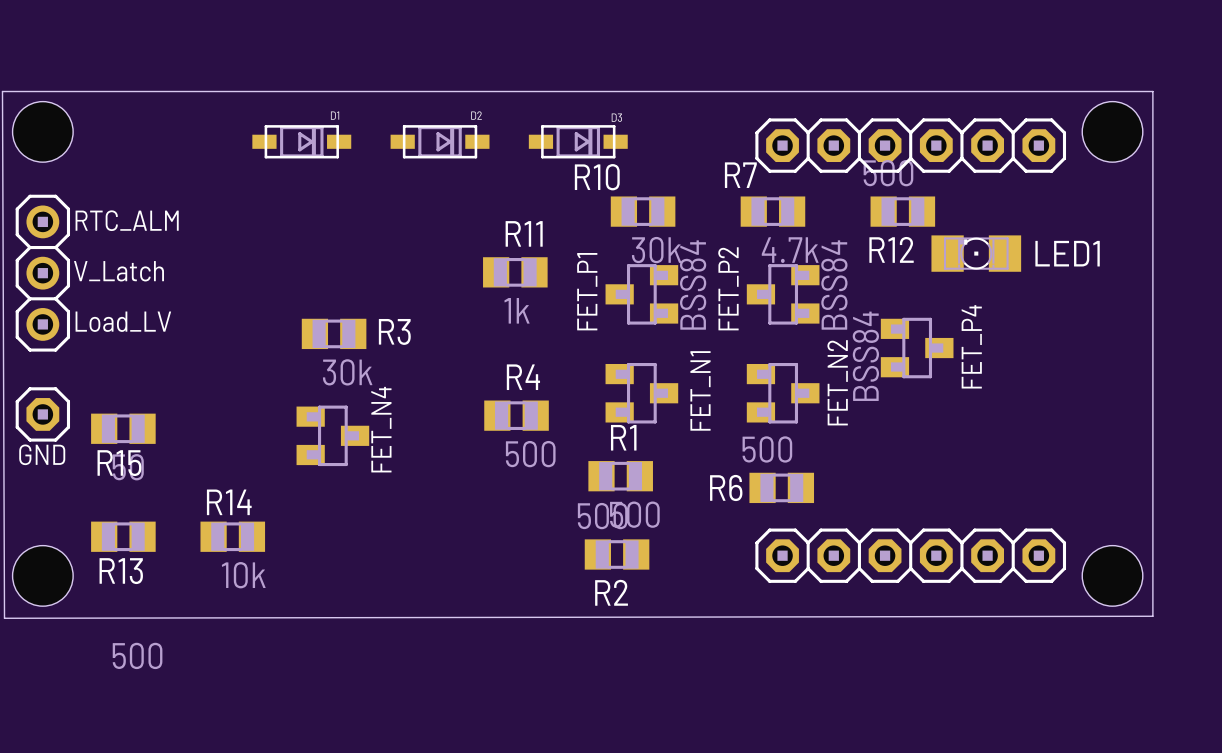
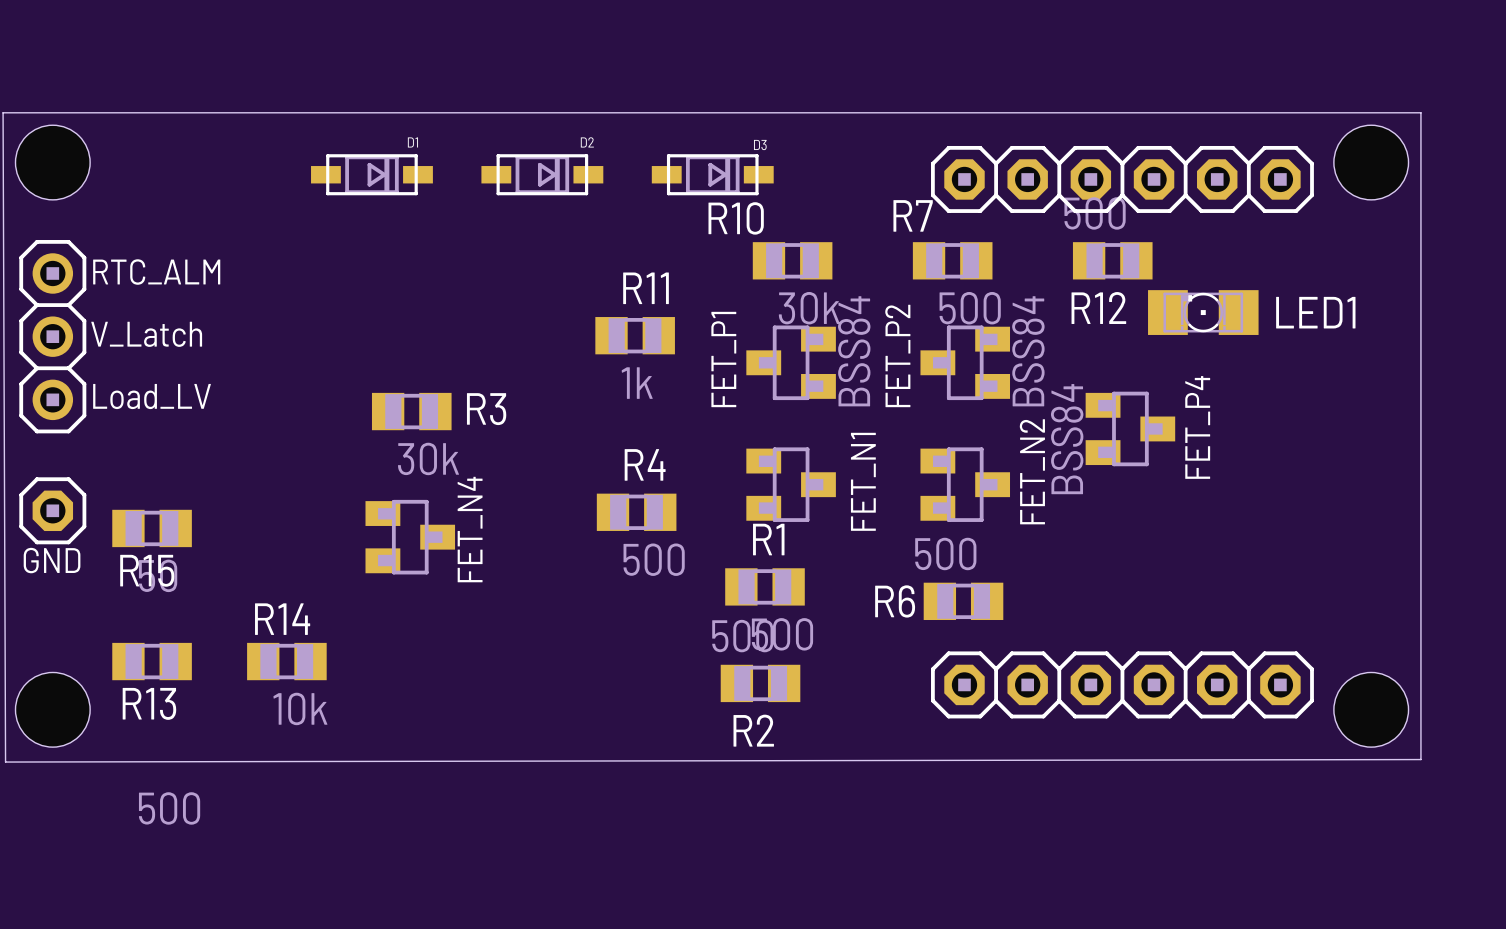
R7 value: 4.7k (790, 250) -> 500 (970, 308)

